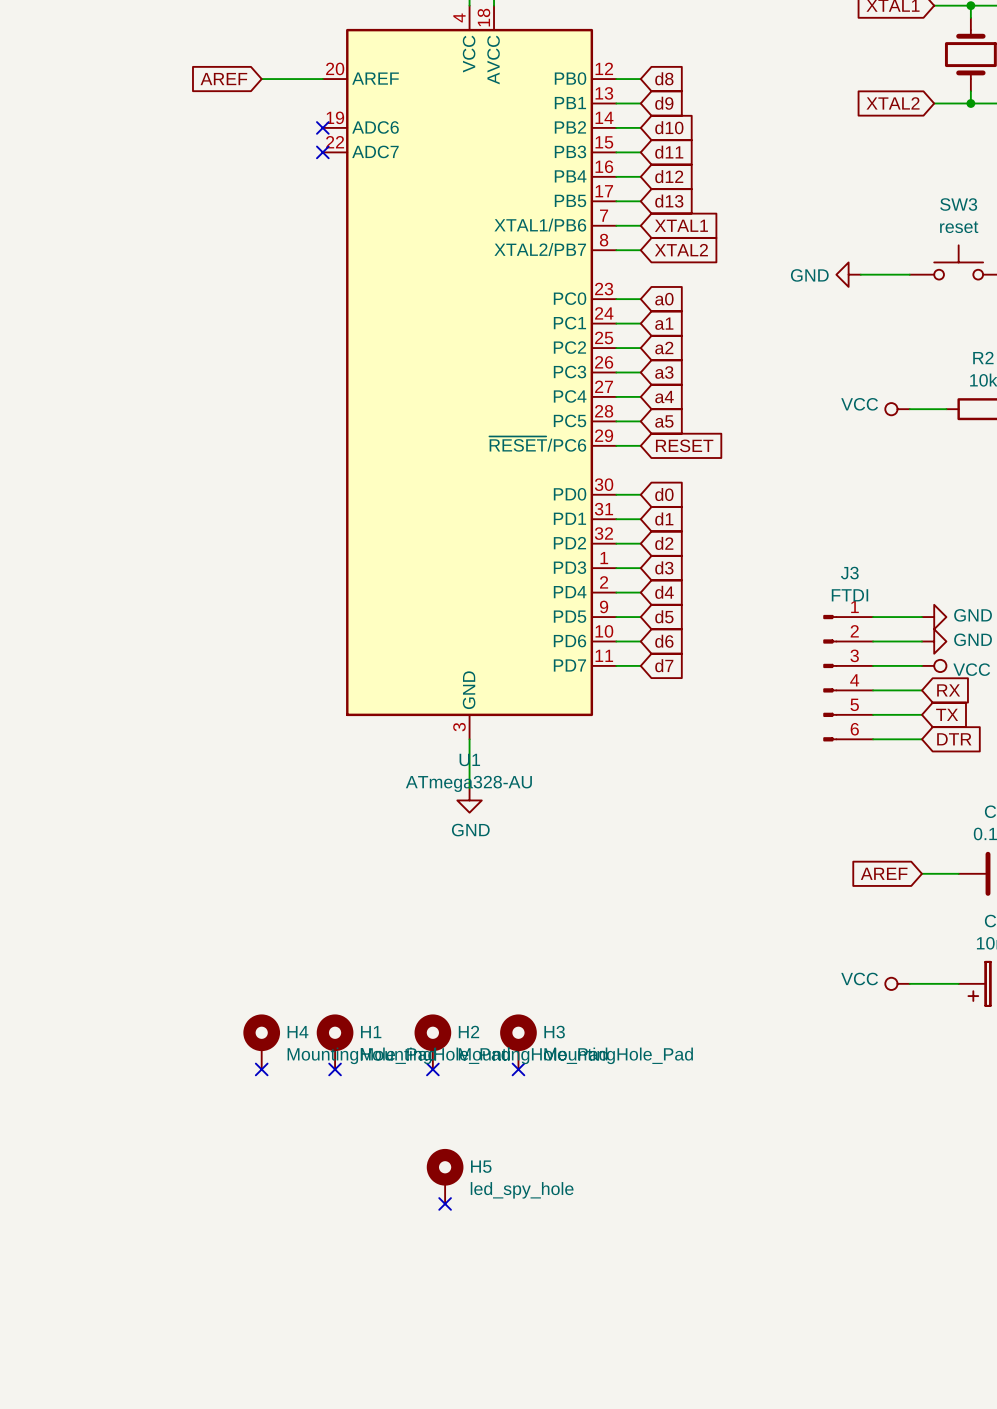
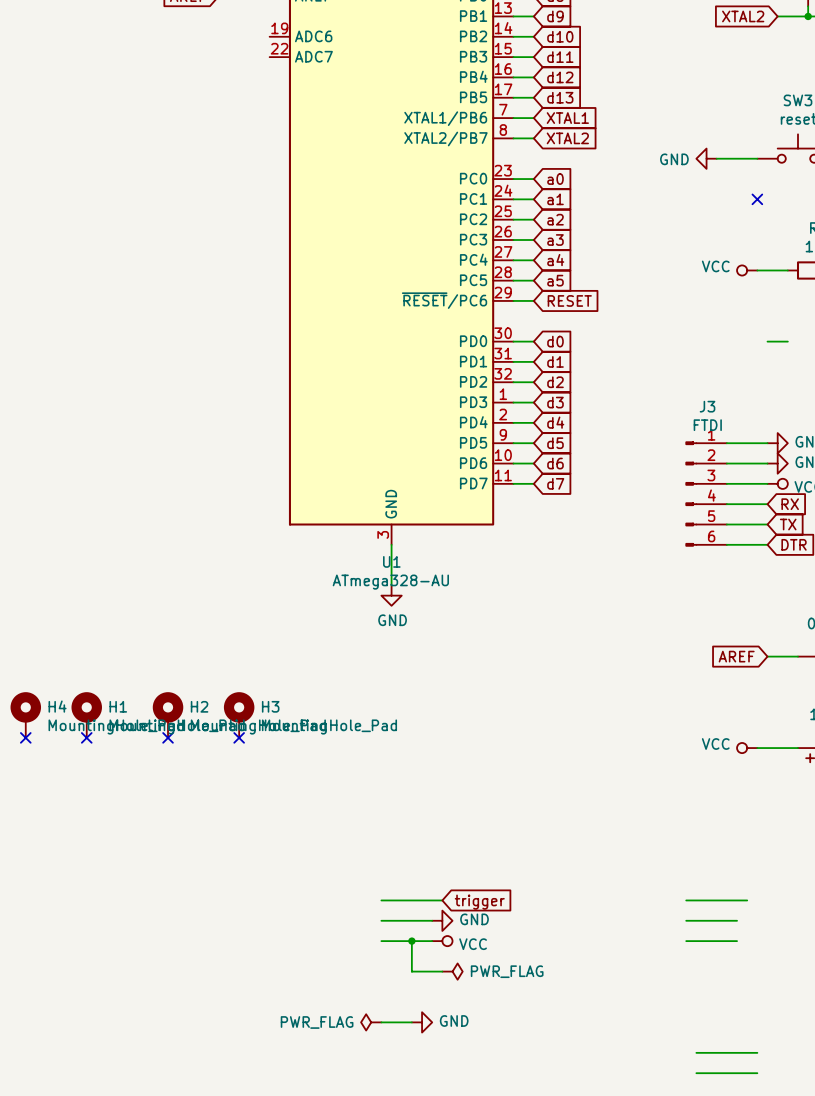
no-connect mark: (322, 127) -> none
no-connect mark: (322, 152) -> none
no-connect mark: none -> (757, 199)
wire: none -> (767, 341) (787, 341)
no-connect mark: none -> (25, 737)
no-connect mark: none -> (86, 737)
no-connect mark: none -> (168, 737)
no-connect mark: none -> (239, 737)
H4 position: (261, 1041) -> (25, 715)
H1 position: (335, 1041) -> (86, 715)
H2 position: (432, 1041) -> (168, 715)
H3 position: (518, 1041) -> (239, 715)
no-connect mark: (261, 1069) -> none
no-connect mark: (335, 1069) -> none
no-connect mark: (432, 1069) -> none
no-connect mark: (518, 1069) -> none
wire: none -> (381, 900) (442, 900)
wire: none -> (686, 900) (747, 900)
global label: none -> trigger (479, 902)
H5: led_spy_hole (445, 1176) -> none
wire: none -> (381, 920) (432, 920)
power symbol: none -> GND (442, 920)
wire: none -> (686, 920) (737, 920)
no-connect mark: (445, 1203) -> none
wire: none -> (381, 941) (432, 941)
wire: none -> (411, 941) (411, 971) (442, 971)
junction: none -> (411, 941)
power symbol: none -> VCC (442, 941)
wire: none -> (686, 941) (737, 941)
power symbol: none -> PWR_FLAG (452, 971)
power symbol: none -> PWR_FLAG (371, 1022)
wire: none -> (381, 1022) (411, 1022)
power symbol: none -> GND (422, 1022)
wire: none -> (696, 1052) (757, 1052)
wire: none -> (696, 1073) (757, 1073)

